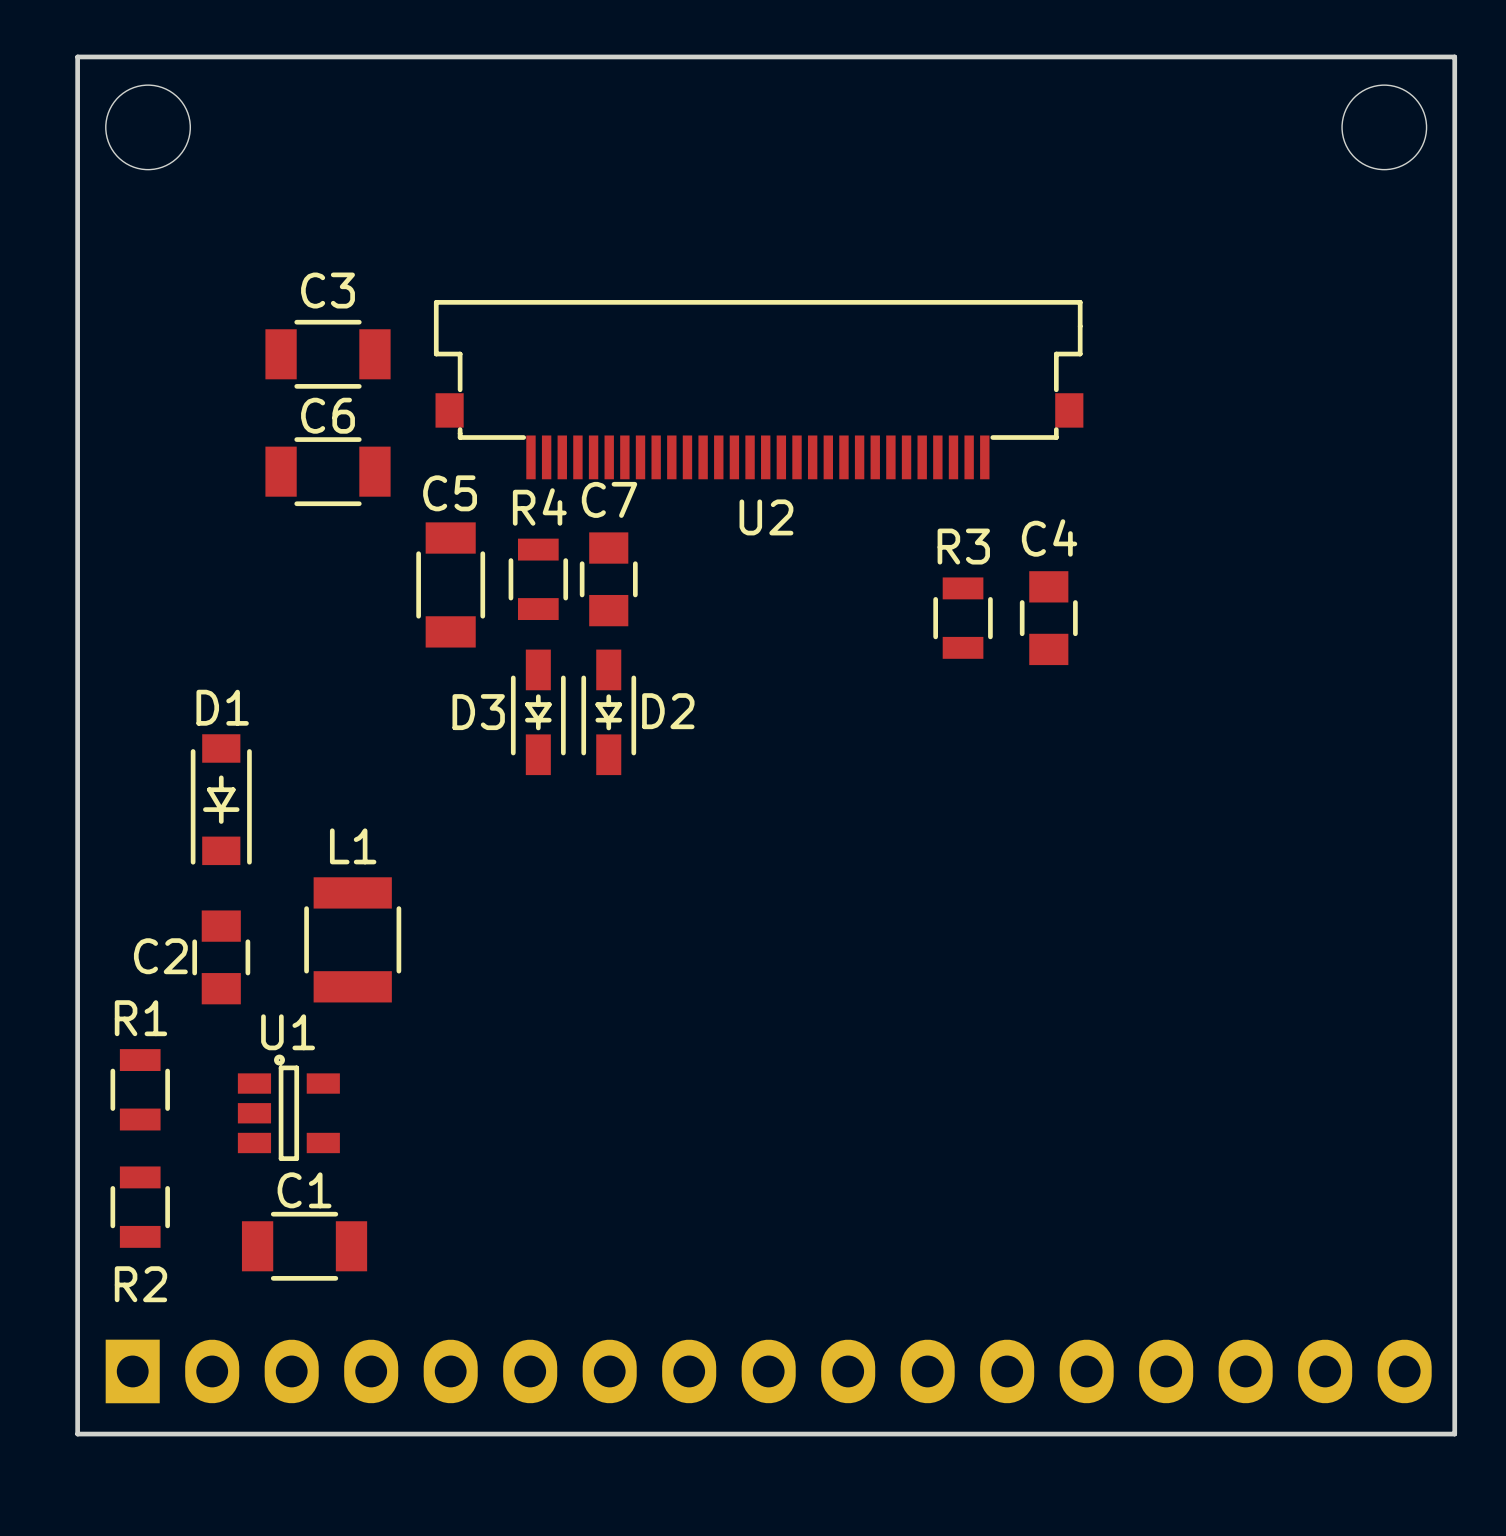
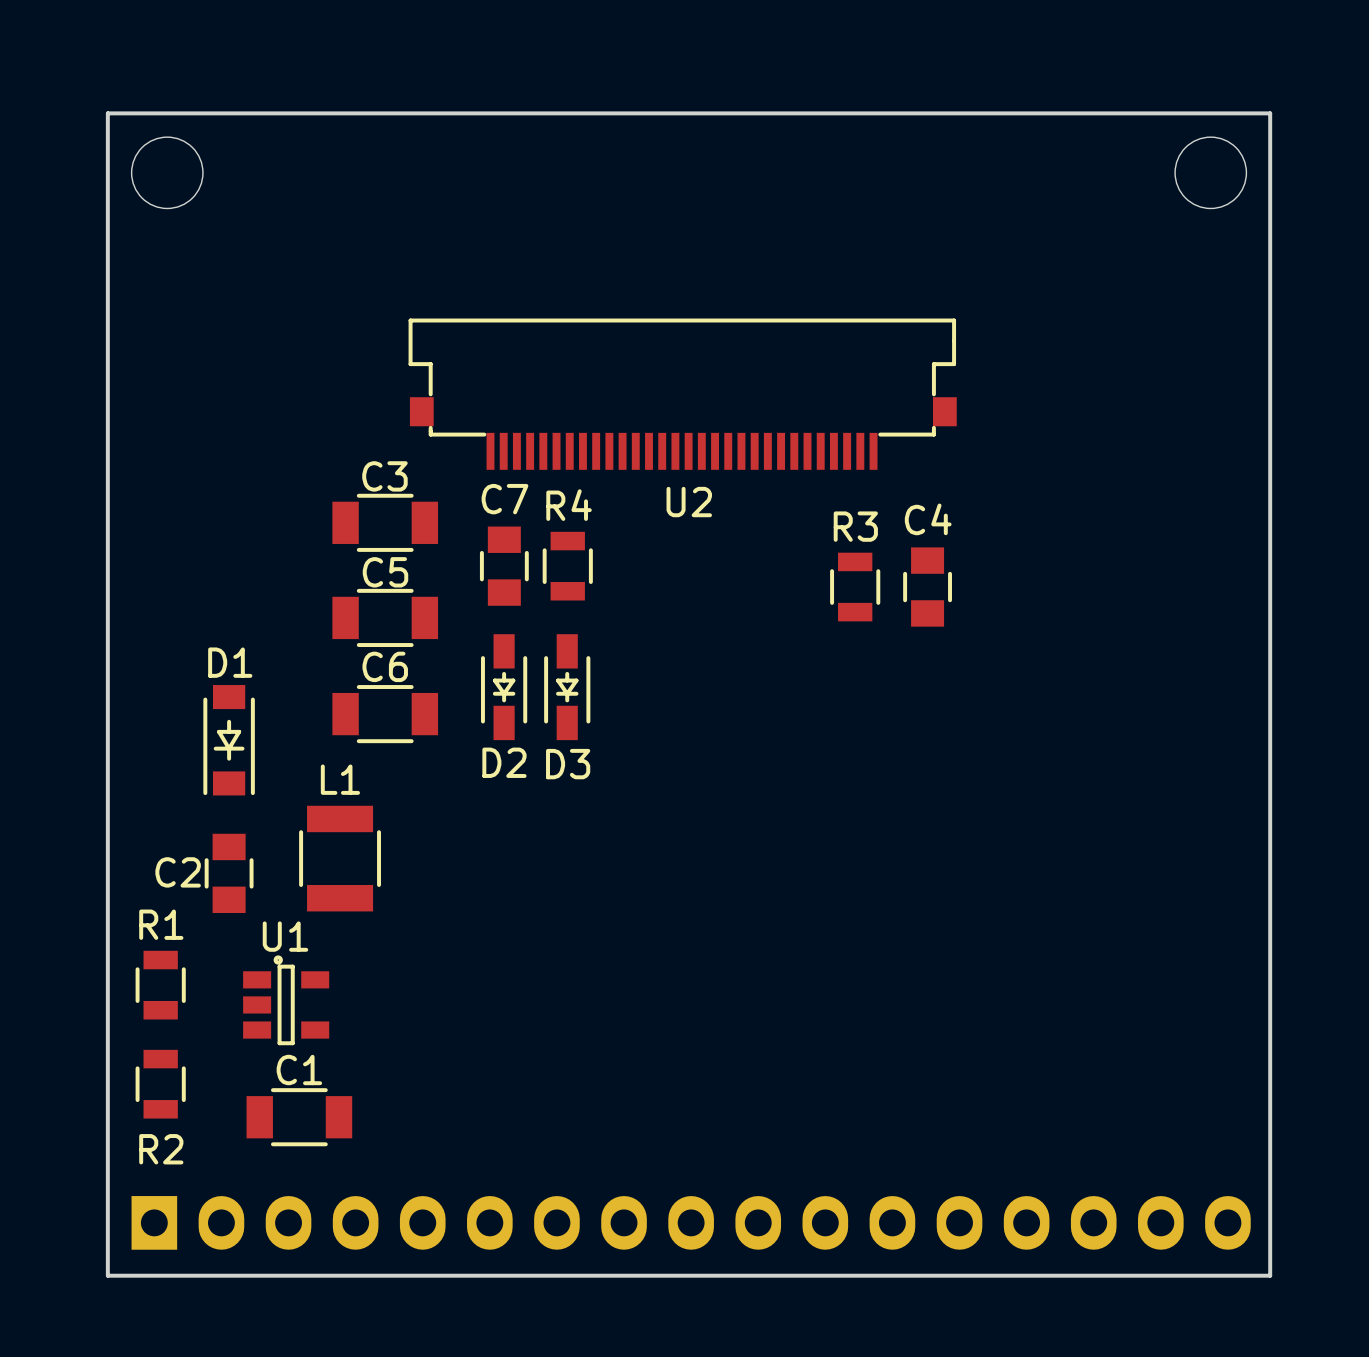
C3 name position: C3 (328, 290) -> C3 (384, 476)
C3 position: (328, 354) -> (385, 522)
C6 position: (328, 471) -> (385, 714)
R4 position: (538, 579) -> (567, 566)
C7 position: (608, 579) -> (504, 566)
C5 rotation: 0° (450, 584) -> 90° clockwise (385, 617)
C5 position: (450, 584) -> (385, 617)
D2 name position: D2 (668, 711) -> D2 (504, 762)
D3 name position: D3 (478, 712) -> D3 (568, 764)
D3 position: (538, 712) -> (567, 687)
D2 position: (608, 712) -> (504, 687)

